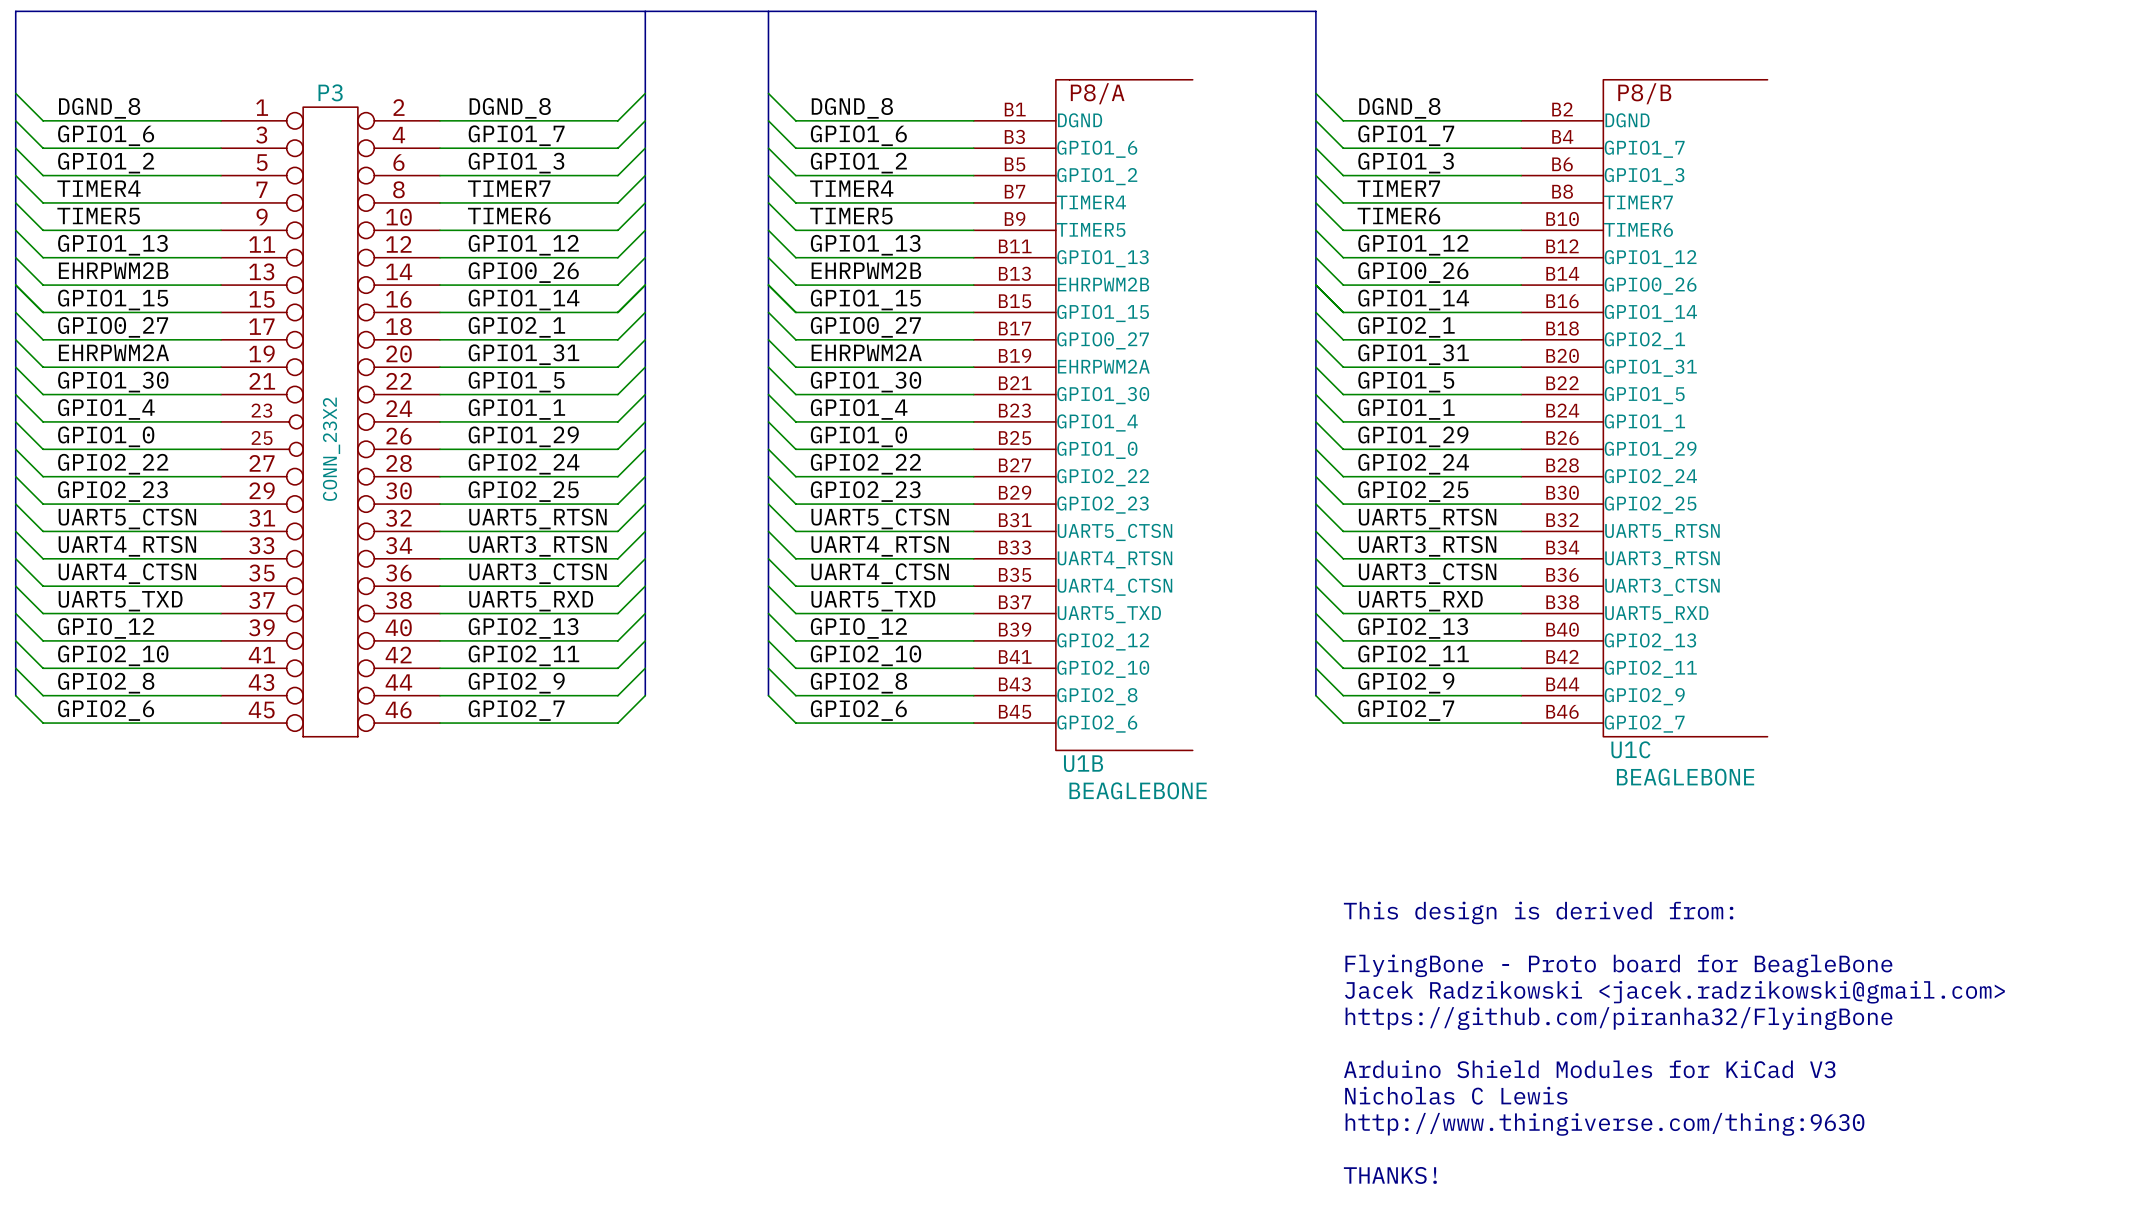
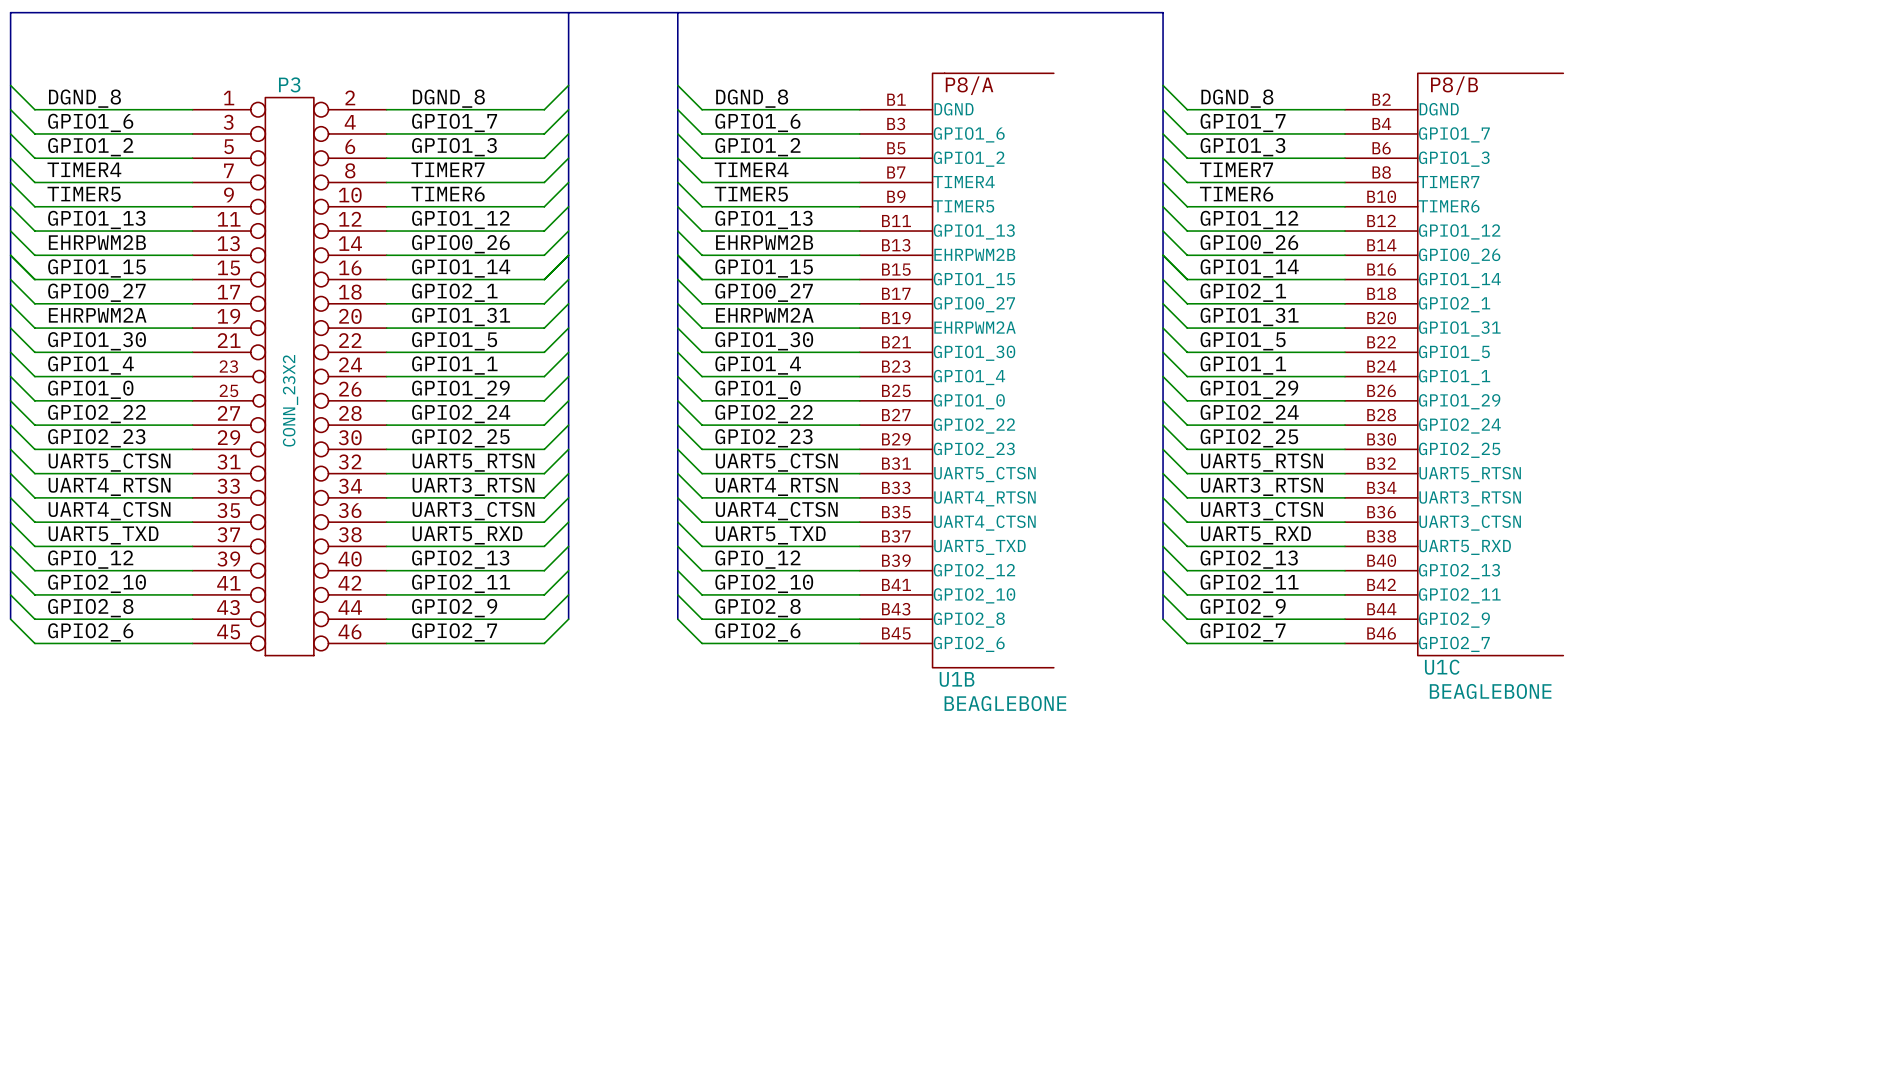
text: This design is derived from: (1538, 912) -> none
text: FlyingBone - Proto board for BeagleBone (1618, 965) -> none
text: Jacek Radzikowski <jacek.radzikowski@gmail.com> (1674, 992) -> none
text: https://github.com/piranha32/FlyingBone (1618, 1018) -> none
text: Arduino Shield Modules for KiCad V3 (1589, 1069) -> none
text: Nicholas C Lewis (1456, 1095) -> none
text: http://www.thingiverse.com/thing:9630 (1604, 1124) -> none
text: THANKS! (1390, 1175) -> none

